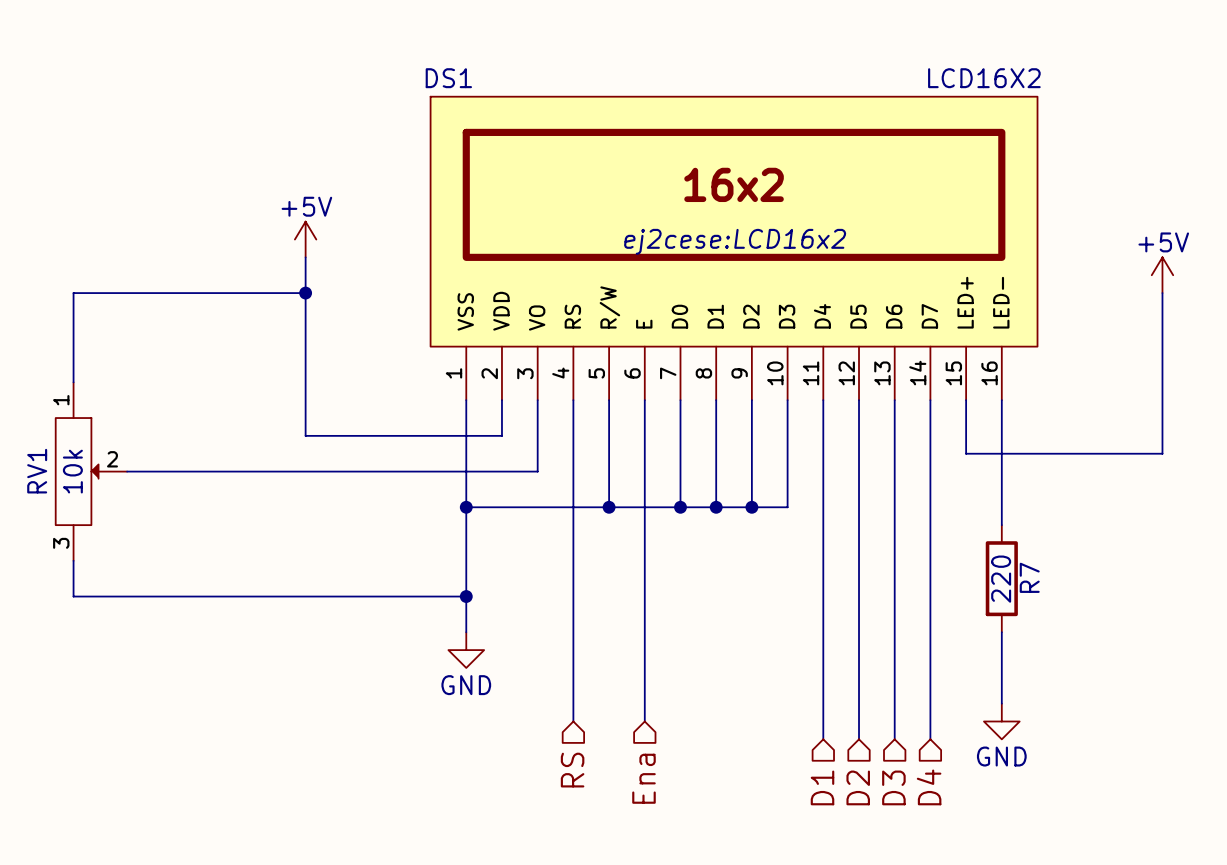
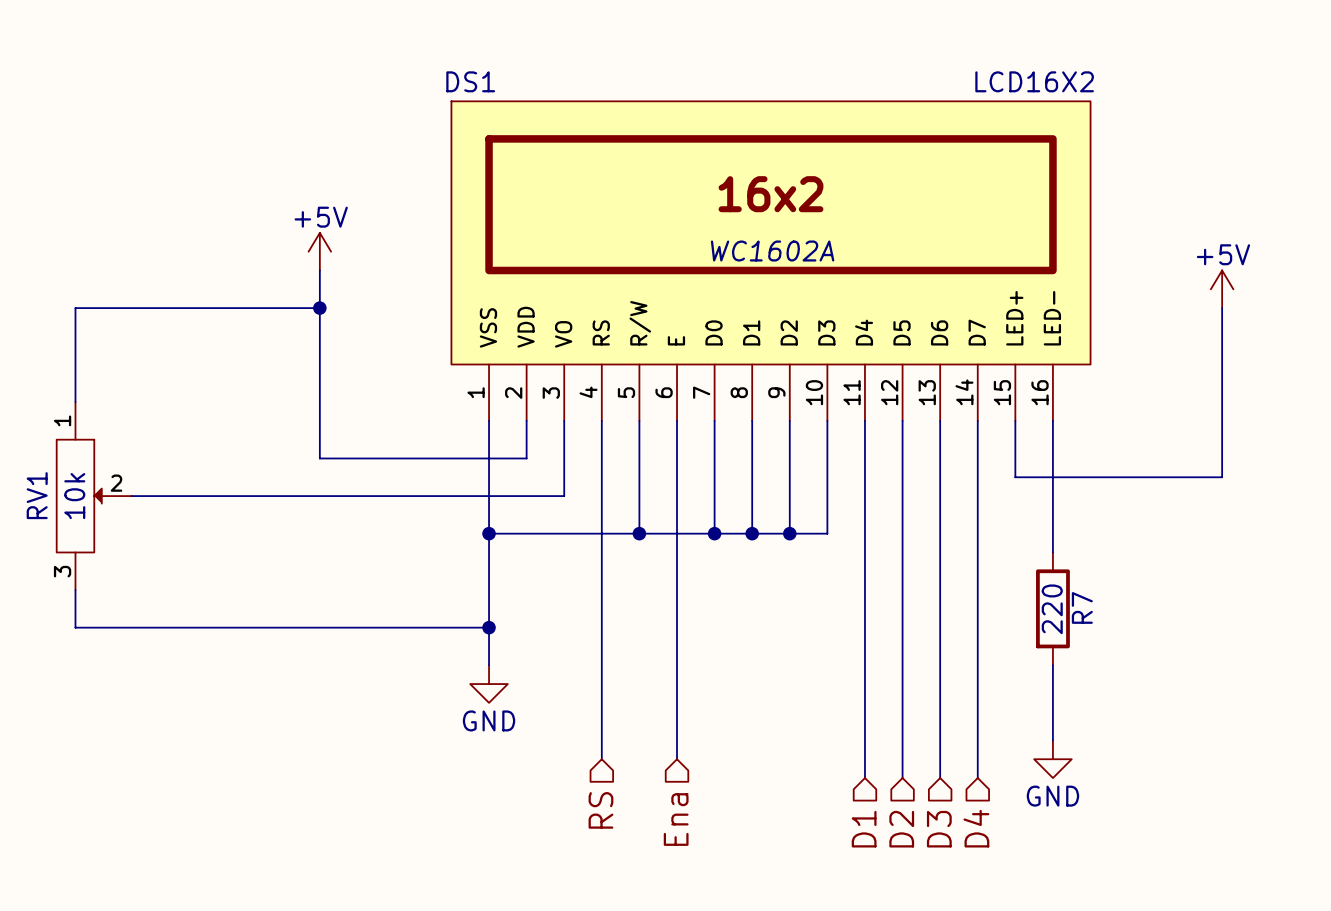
DS1 text: ej2cese:LCD16x2 (735, 241) -> WC1602A (772, 251)

